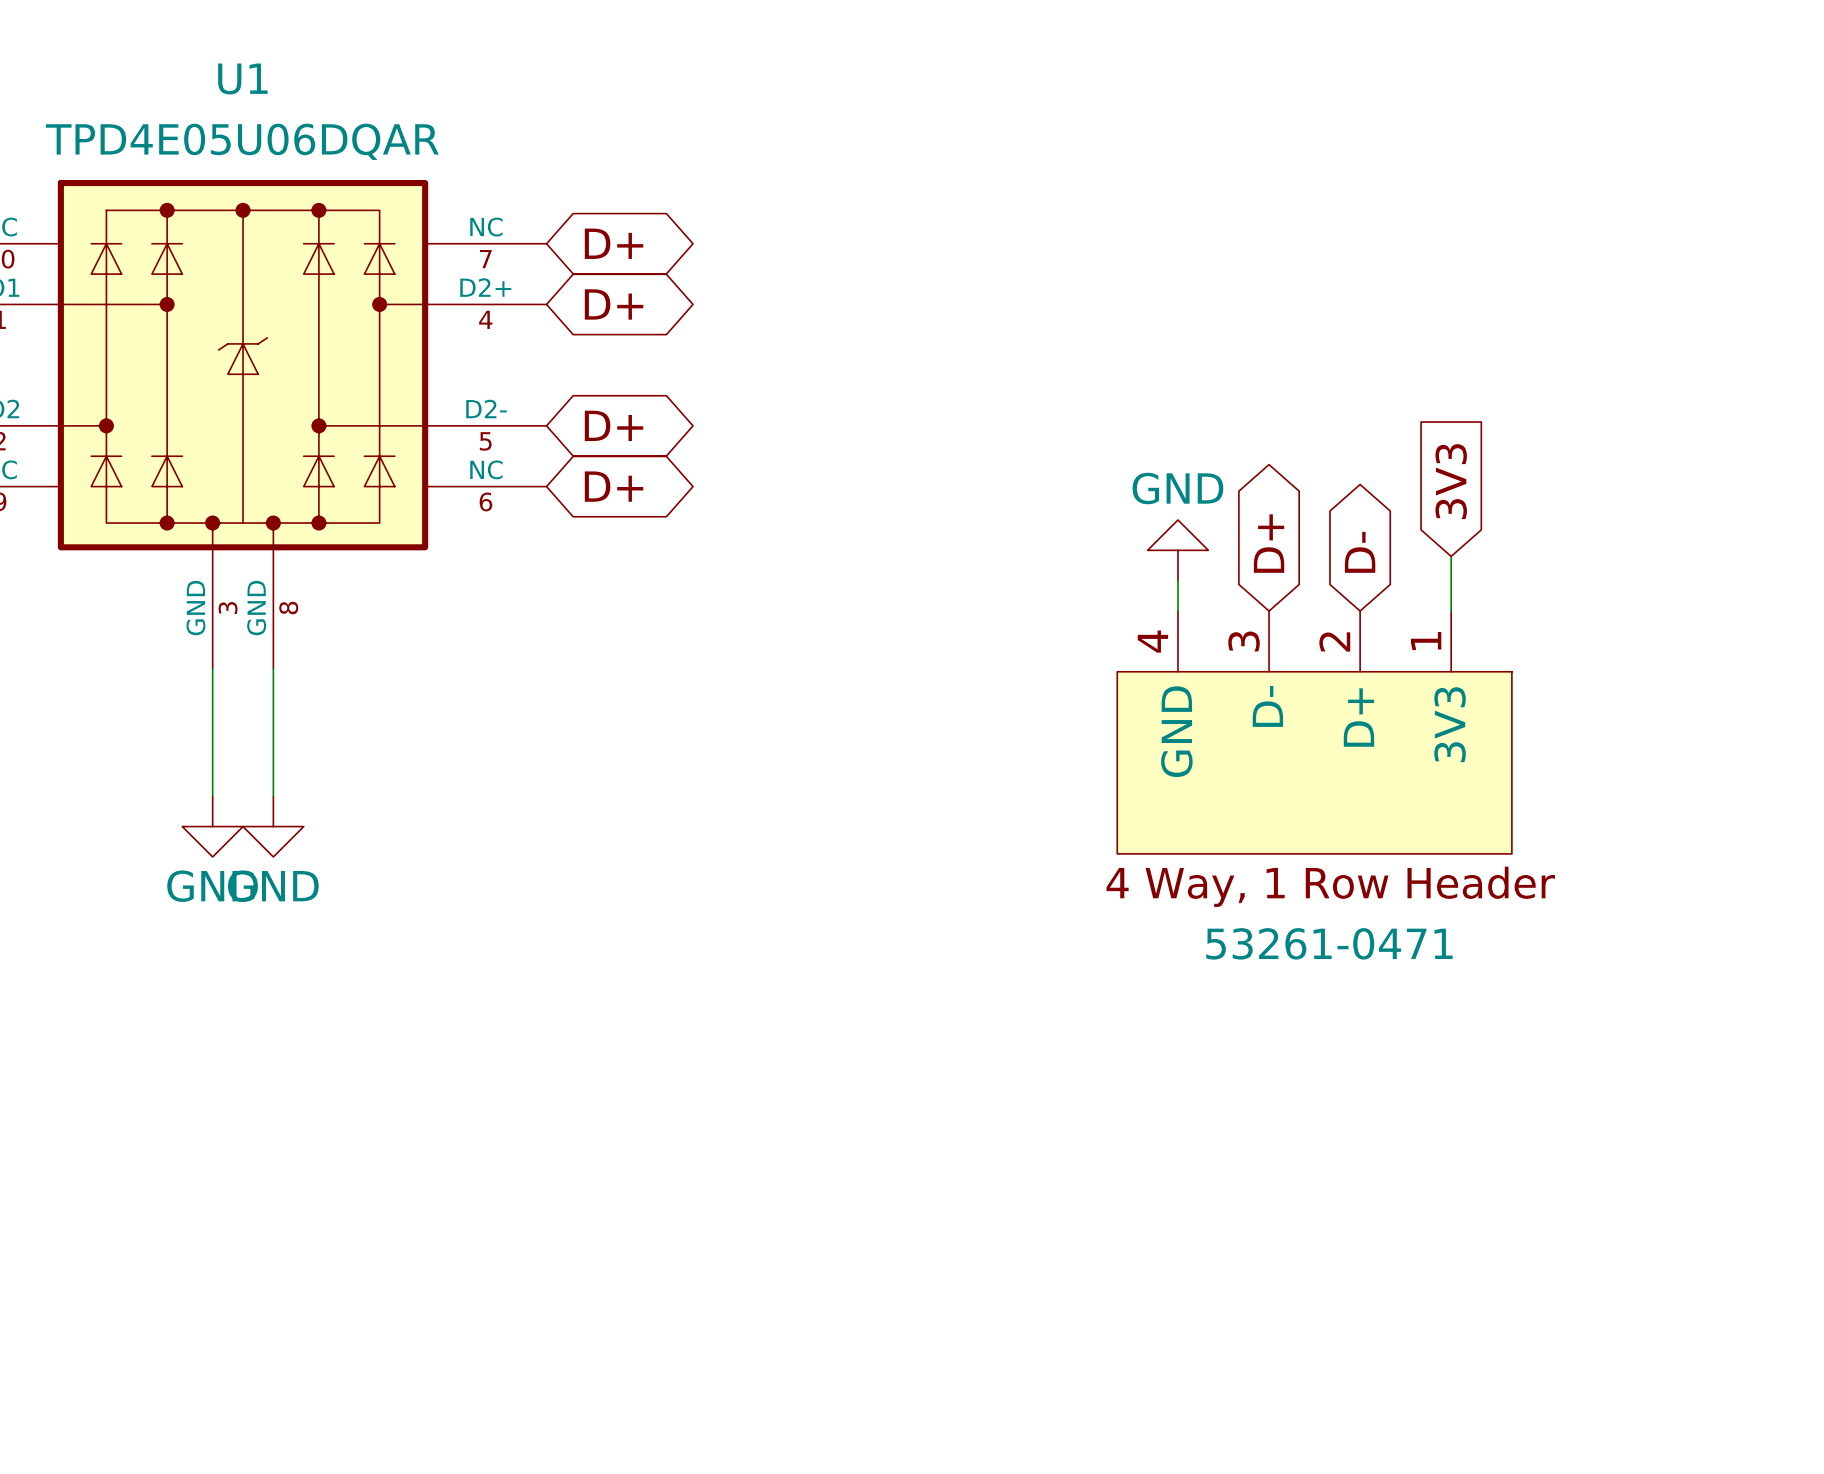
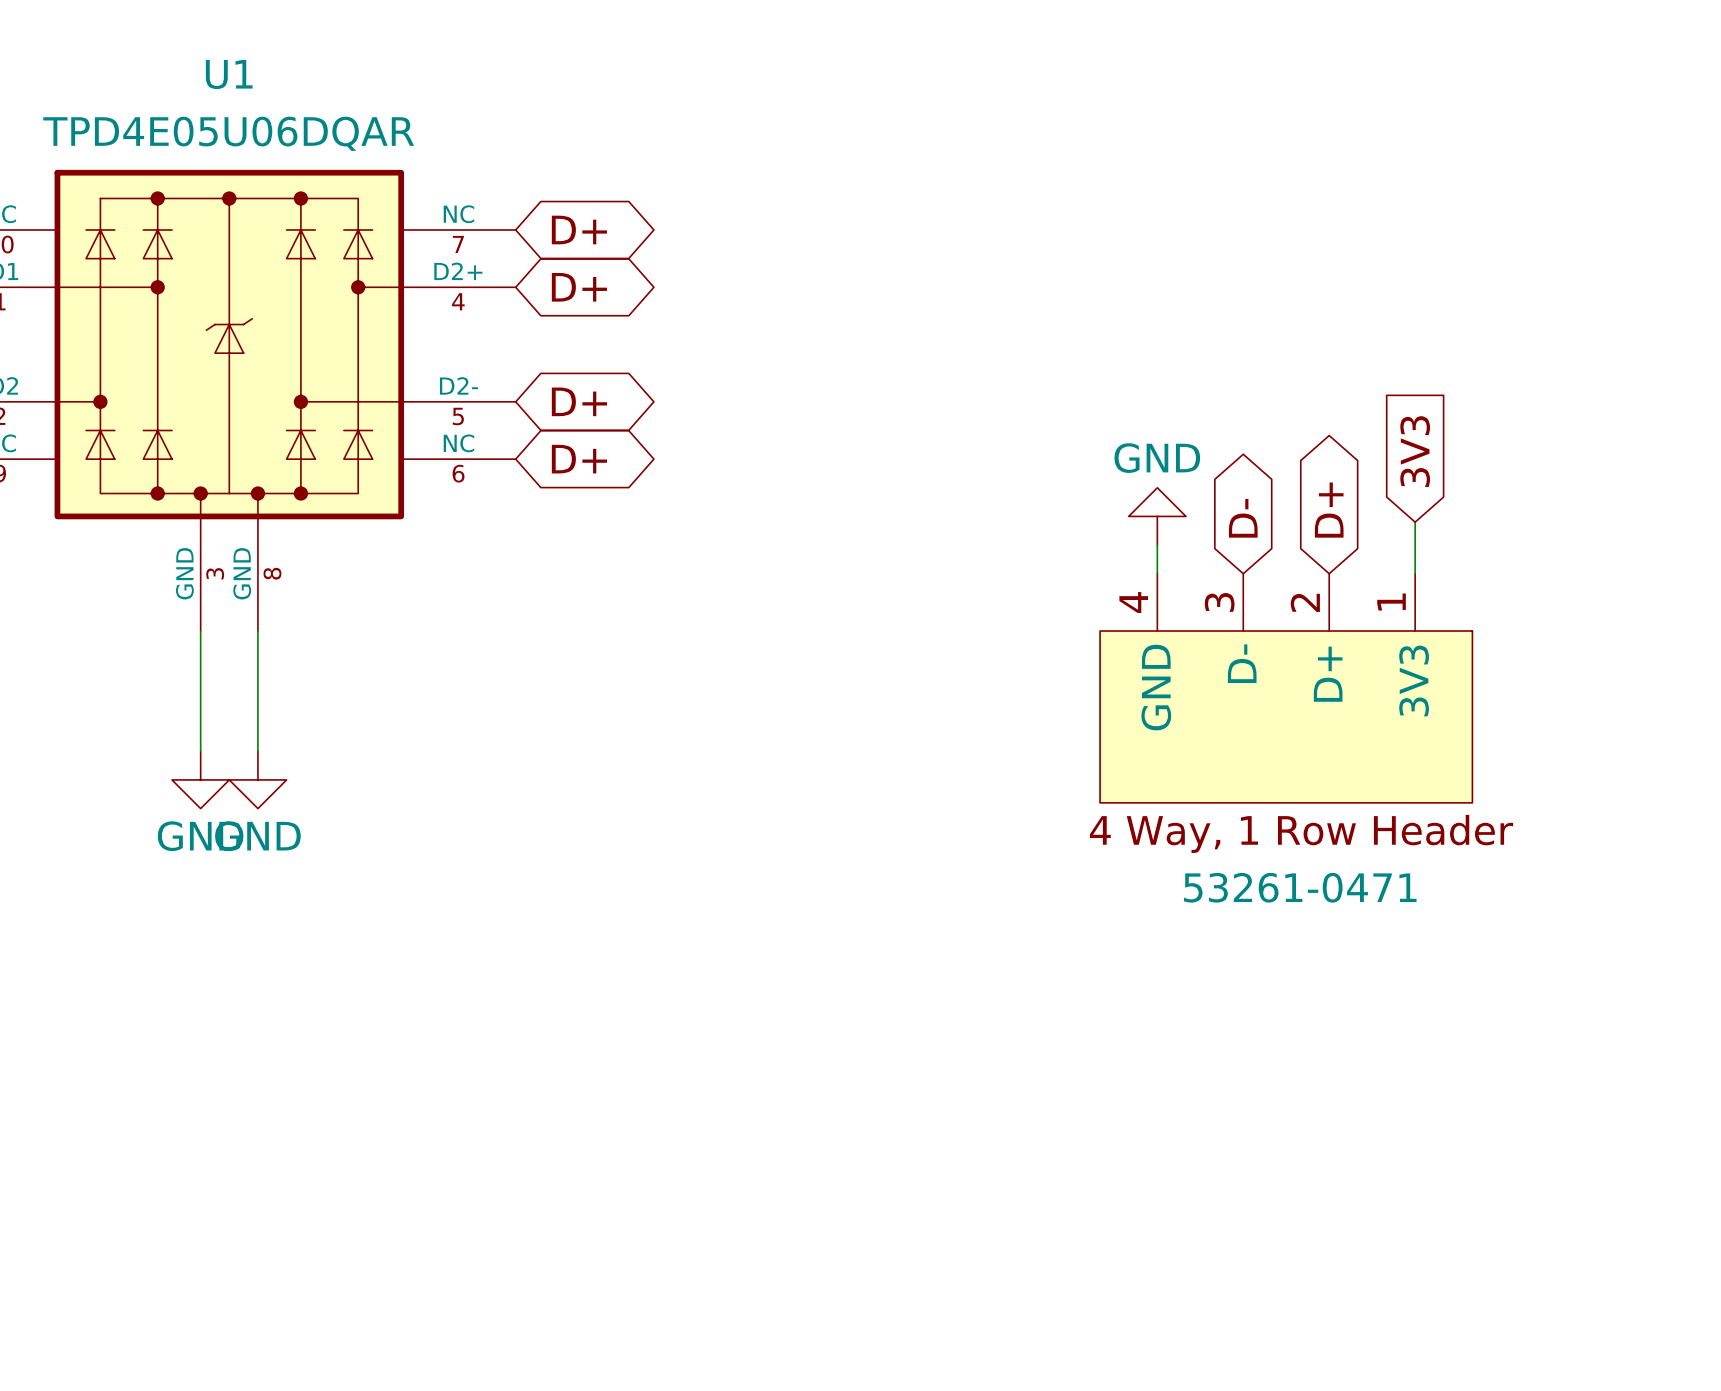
global label position: 3V3 (1451, 481) -> 3V3 (1415, 451)
global label position: D+ (1269, 543) -> D+ (1329, 510)
power symbol position: GND (1177, 550) -> GND (1157, 516)
global label position: D- (1360, 552) -> D- (1243, 518)
wire: (1451, 556) (1451, 611) -> (1415, 522) (1415, 573)
wire: (1177, 580) (1177, 611) -> (1157, 545) (1157, 573)
part position: (1314, 732) -> (1286, 688)

